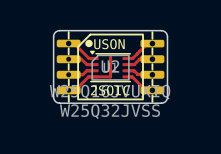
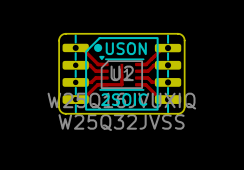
top track: (110, 57) (110, 67) -> none

